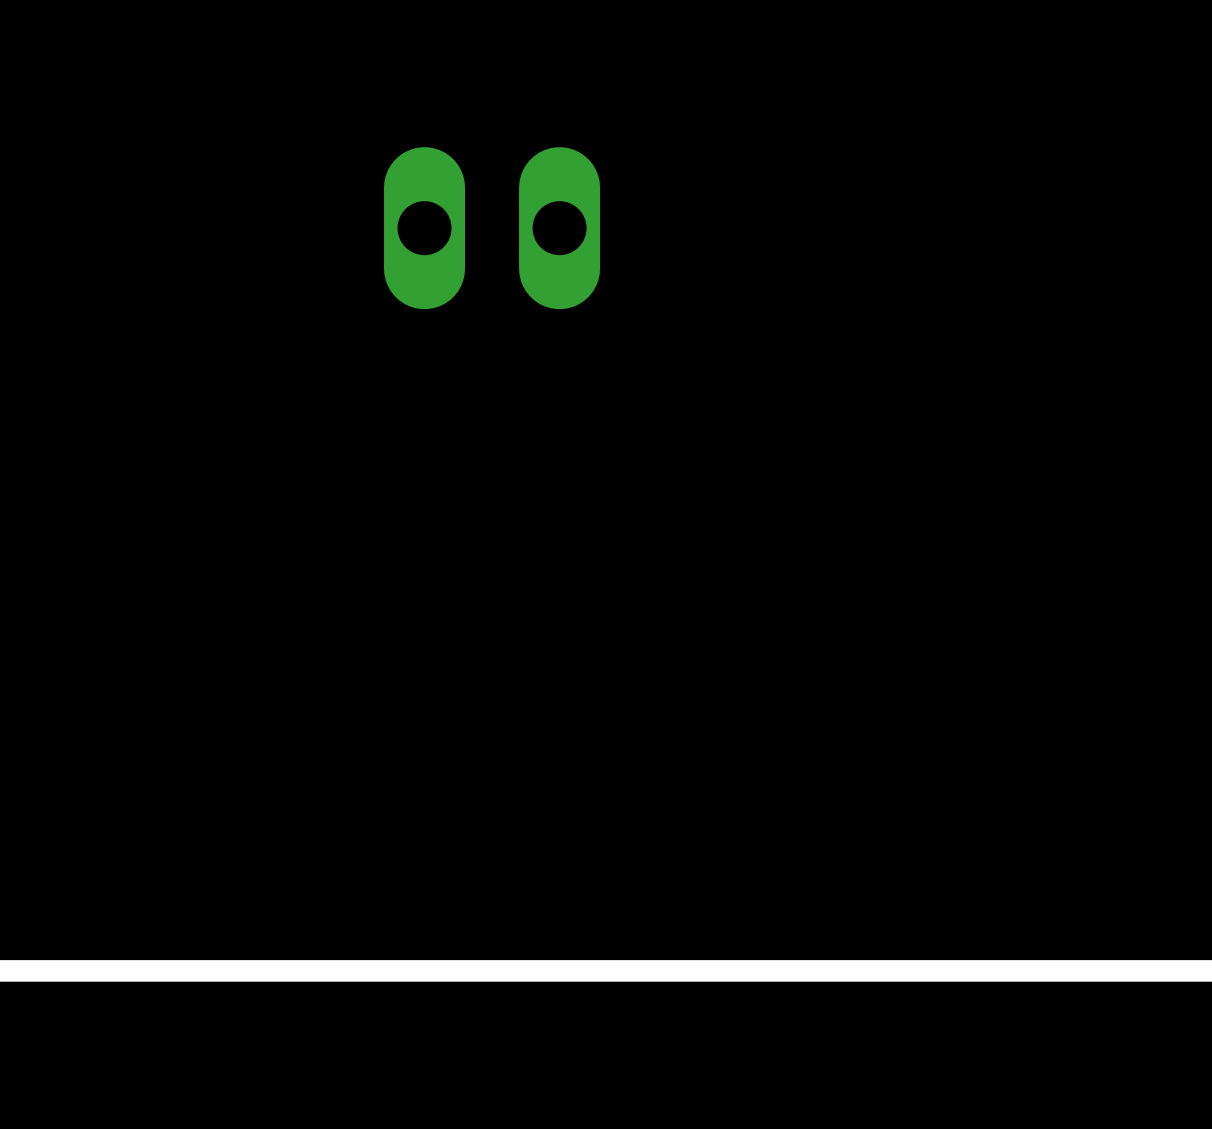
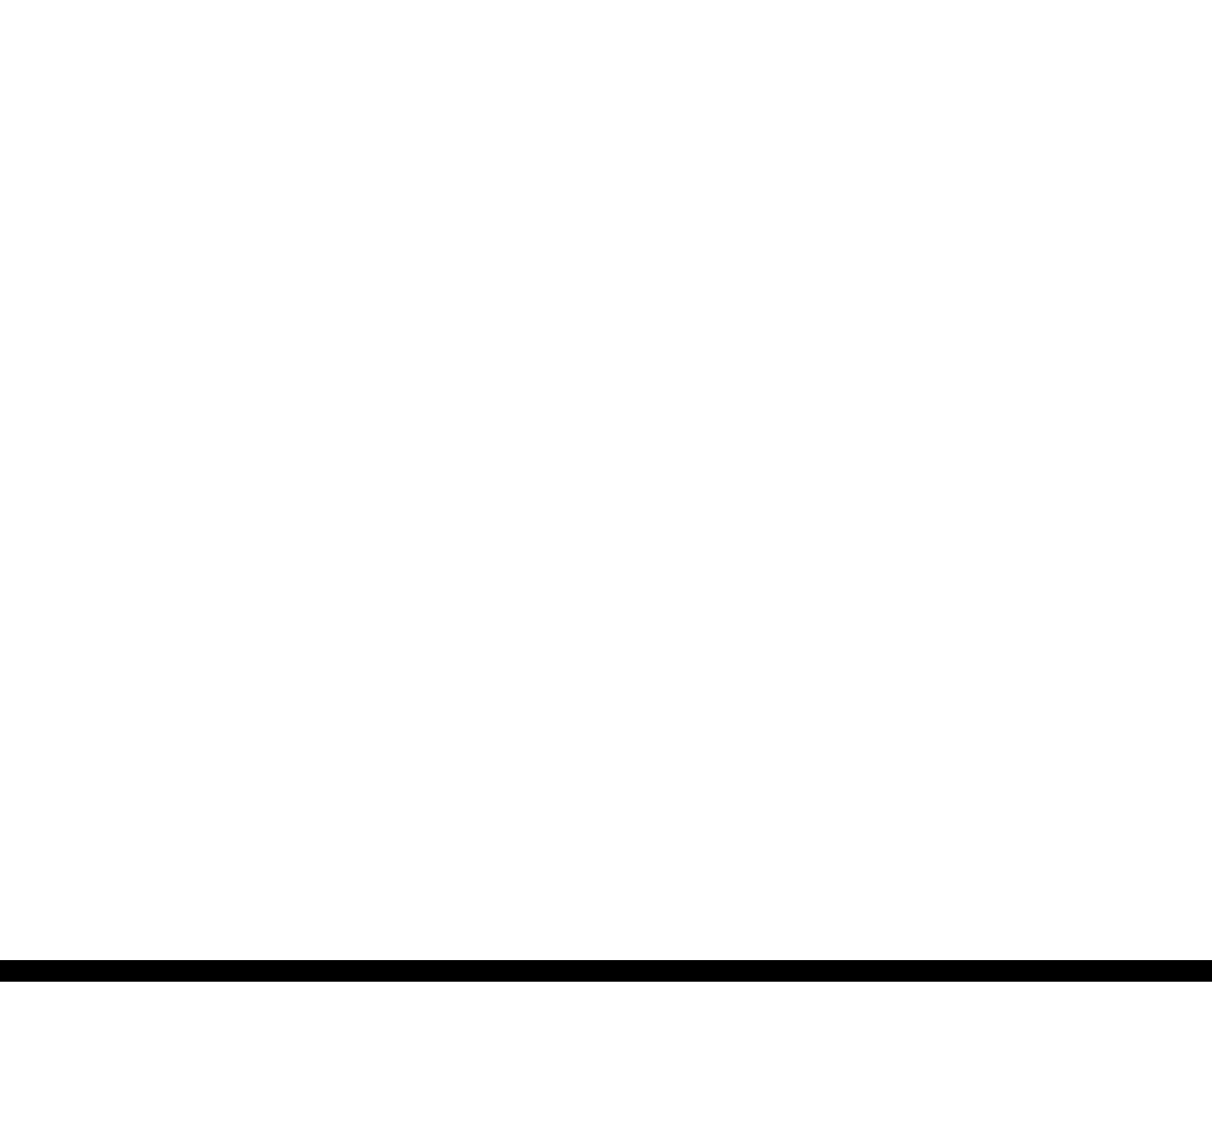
part: (492, 228) -> none

